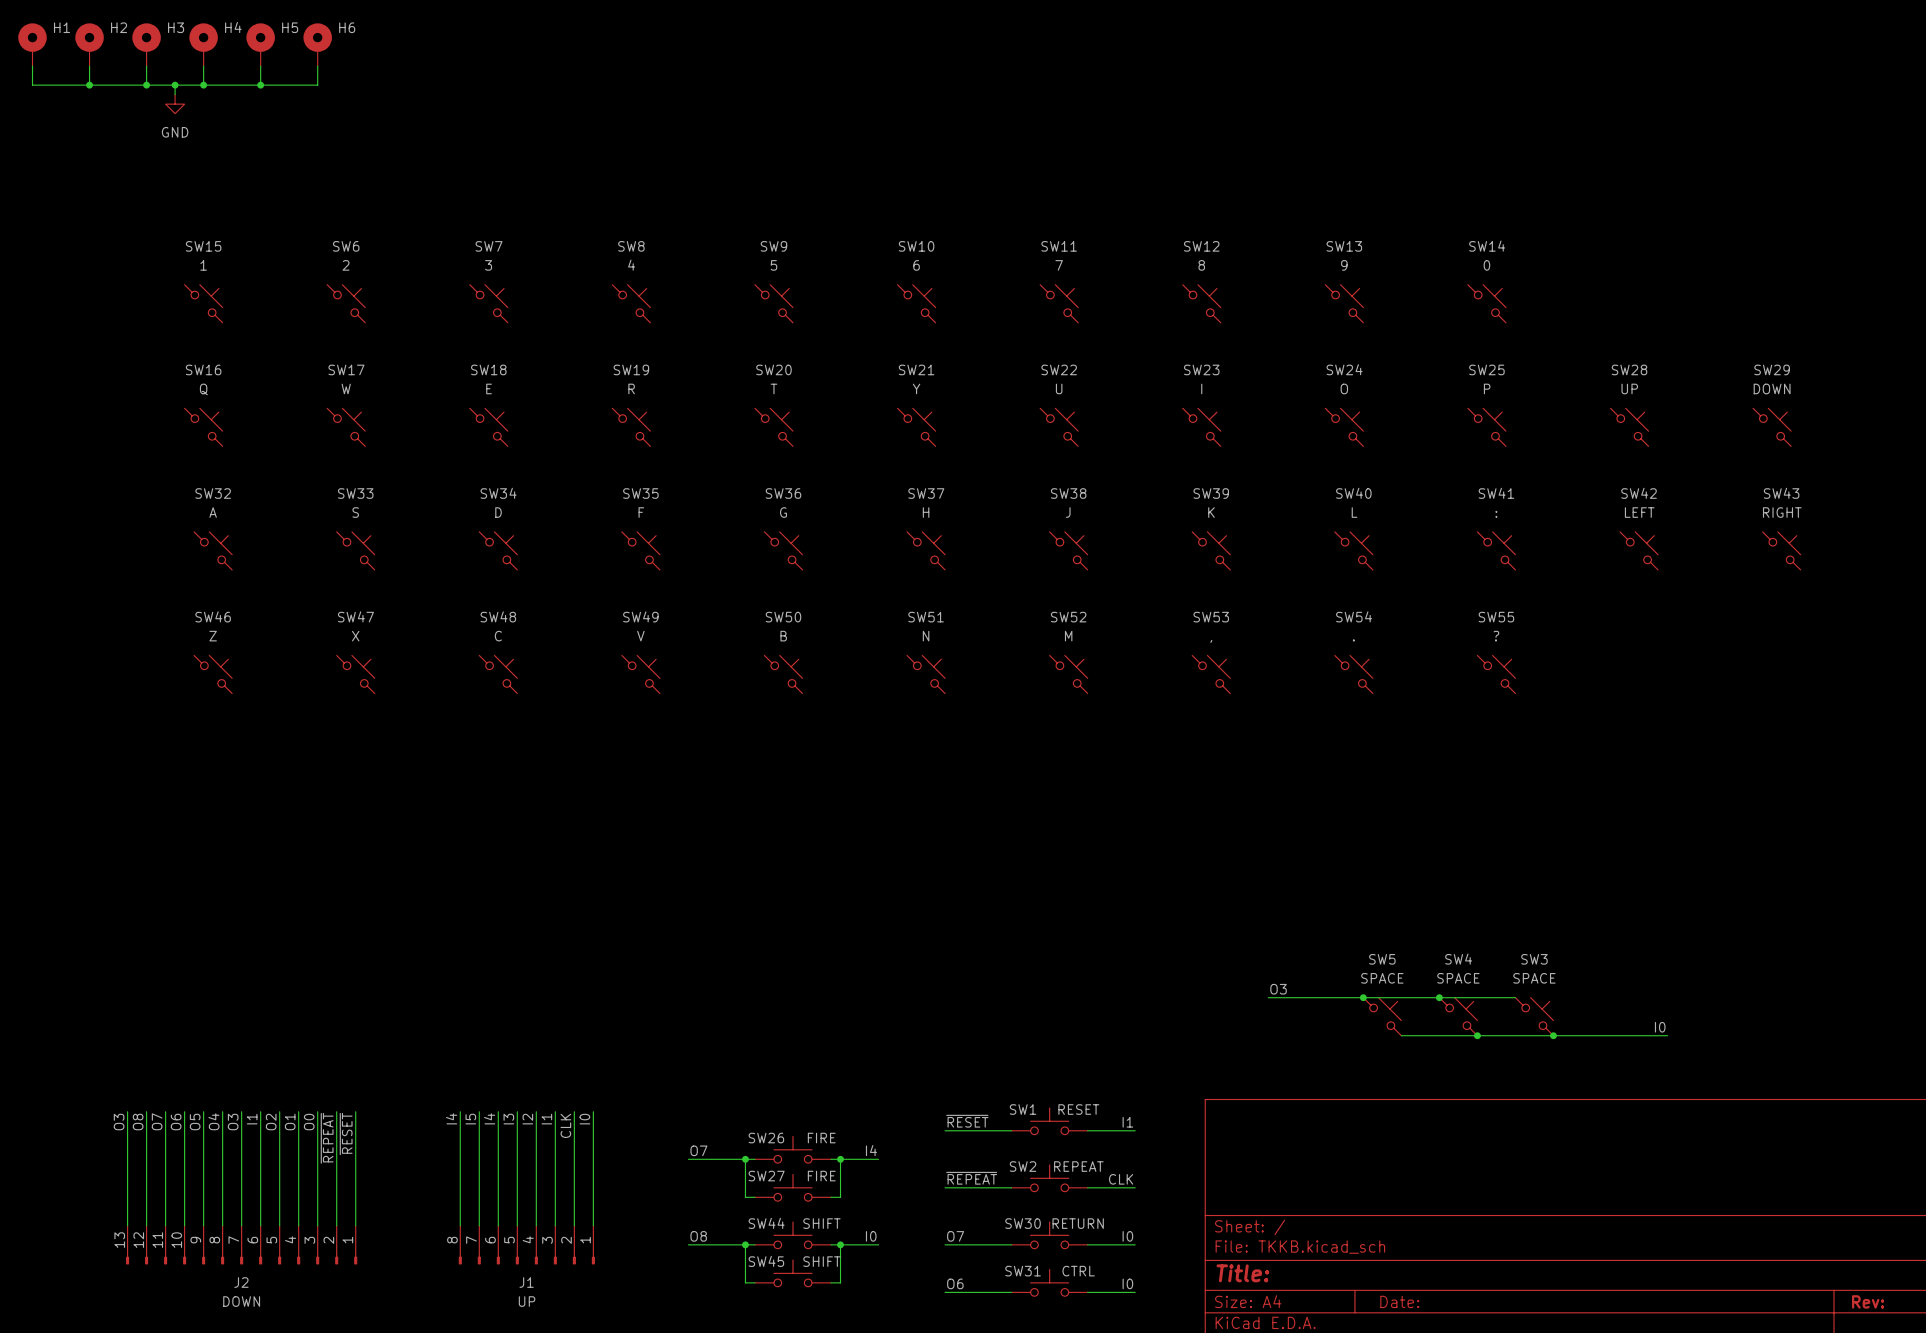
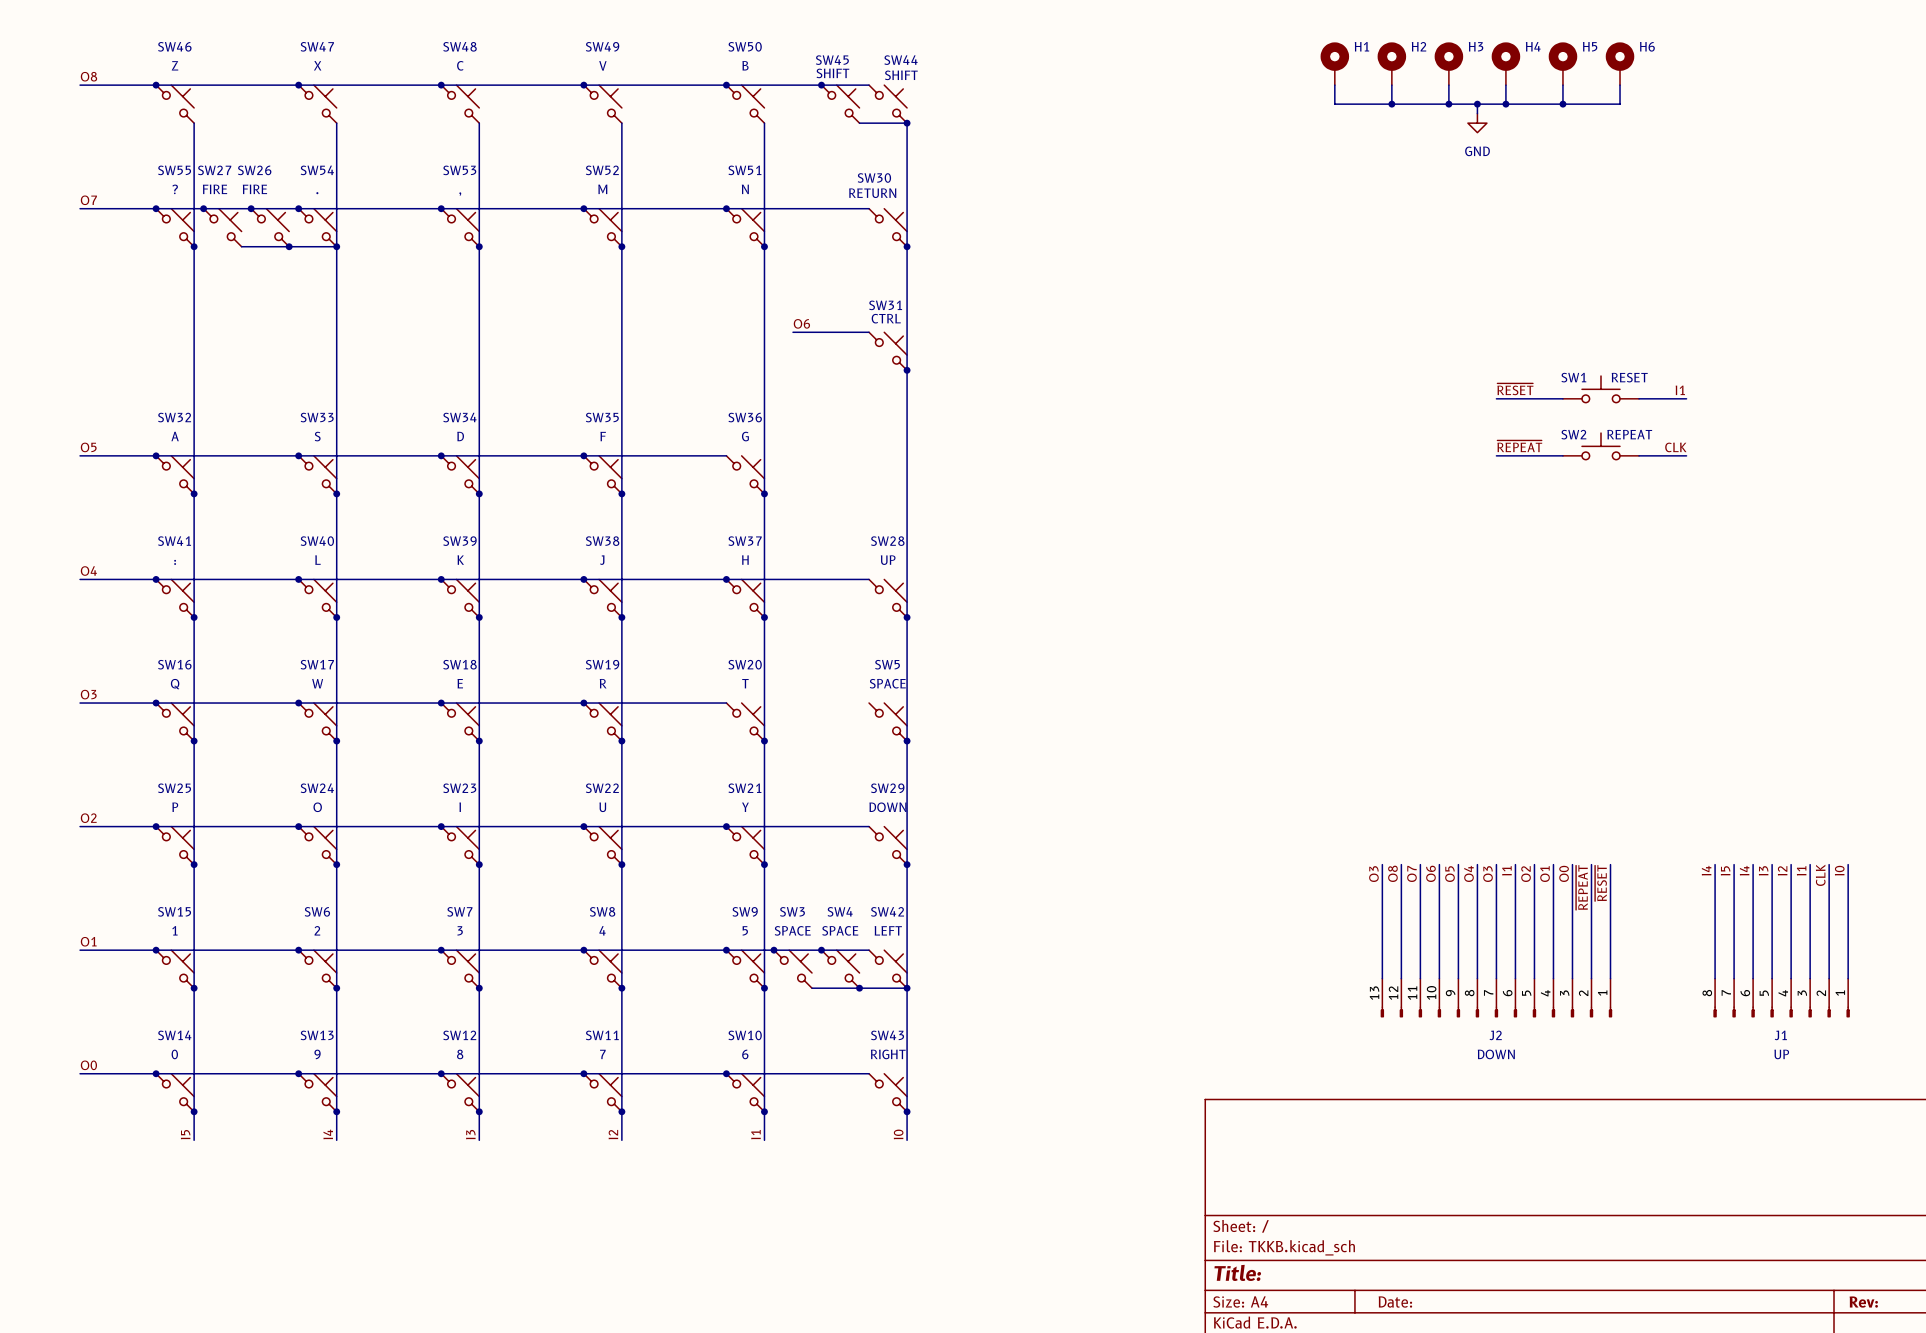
H1 position: (32, 44) -> (1334, 63)
H2 position: (89, 44) -> (1391, 63)
H3 position: (146, 44) -> (1448, 63)
H4 position: (203, 44) -> (1505, 63)
H5 position: (260, 44) -> (1562, 63)
H6 position: (317, 44) -> (1620, 63)
wire: (32, 66) (32, 85) (80, 85) -> none
wire: (89, 66) (89, 85) -> none
wire: (146, 66) (146, 85) -> none
wire: (203, 66) (203, 85) -> none
wire: (260, 66) (260, 85) -> none
wire: (317, 66) (317, 85) -> (869, 85) (317, 85)
label: none -> O8 (88, 76)
junction: (89, 85) -> none
junction: (146, 85) -> none
junction: none -> (156, 85)
wire: (175, 85) (175, 94) -> none
junction: (175, 85) -> none
junction: (203, 85) -> none
junction position: (260, 85) -> (298, 85)
junction: none -> (441, 85)
junction: none -> (583, 85)
junction: none -> (726, 85)
junction: none -> (821, 85)
wire: none -> (1334, 85) (1334, 104) (1620, 104) (1620, 85)
wire: none -> (1391, 85) (1391, 104)
wire: none -> (1448, 85) (1448, 104)
wire: none -> (1505, 85) (1505, 104)
wire: none -> (1562, 85) (1562, 104)
power symbol: GND (175, 104) -> none
junction: none -> (1391, 104)
junction: none -> (1448, 104)
wire: none -> (1477, 104) (1477, 113)
junction: none -> (1477, 104)
junction: none -> (1505, 104)
junction: none -> (1562, 104)
wire: none -> (194, 123) (194, 1140)
wire: none -> (336, 123) (336, 1111)
wire: none -> (479, 123) (479, 1111)
wire: none -> (621, 123) (621, 1140)
wire: none -> (764, 123) (764, 1140)
wire: none -> (859, 123) (907, 123) (907, 1140)
junction: none -> (907, 123)
power symbol: none -> GND (1477, 123)
label: none -> O7 (88, 200)
wire: none -> (80, 208) (869, 208)
junction: none -> (156, 208)
junction: none -> (203, 208)
junction: none -> (251, 208)
junction: none -> (298, 208)
junction: none -> (441, 208)
junction: none -> (583, 208)
junction: none -> (726, 208)
junction: none -> (194, 246)
wire: none -> (241, 246) (336, 246)
junction: none -> (289, 246)
junction: none -> (336, 246)
junction: none -> (479, 246)
junction: none -> (621, 246)
junction: none -> (764, 246)
junction: none -> (907, 246)
SW15 position: (203, 303) -> (175, 969)
SW6 position: (346, 303) -> (317, 969)
SW7 position: (488, 303) -> (460, 969)
SW8 position: (631, 303) -> (602, 969)
SW9 position: (773, 303) -> (745, 969)
SW10 position: (916, 303) -> (745, 1092)
SW11 position: (1059, 303) -> (602, 1092)
SW12 position: (1201, 303) -> (460, 1092)
SW13 position: (1344, 303) -> (317, 1092)
SW14 position: (1486, 303) -> (175, 1092)
label: none -> O6 (801, 323)
wire: none -> (792, 332) (869, 332)
junction: none -> (907, 370)
label: none -> ~{RESET} (1515, 389)
label: none -> I1 (1680, 390)
wire: none -> (1496, 398) (1562, 398)
wire: none -> (1639, 398) (1686, 398)
SW16 position: (203, 427) -> (175, 722)
SW17 position: (346, 427) -> (317, 722)
SW18 position: (488, 427) -> (460, 722)
SW19 position: (631, 427) -> (602, 722)
SW20 position: (773, 427) -> (745, 722)
SW21 position: (916, 427) -> (745, 845)
SW22 position: (1059, 427) -> (602, 845)
SW23 position: (1201, 427) -> (460, 845)
SW24 position: (1344, 427) -> (317, 845)
SW25 position: (1486, 427) -> (175, 845)
SW28 position: (1629, 427) -> (888, 598)
SW29 position: (1772, 427) -> (888, 845)
label: none -> ~{REPEAT} (1519, 446)
label: none -> O5 (88, 447)
label: none -> CLK (1675, 447)
wire: none -> (80, 455) (726, 455)
junction: none -> (156, 455)
junction: none -> (298, 455)
junction: none -> (441, 455)
junction: none -> (583, 455)
wire: none -> (1496, 455) (1562, 455)
wire: none -> (1639, 455) (1686, 455)
junction: none -> (194, 493)
junction: none -> (336, 493)
junction: none -> (479, 493)
junction: none -> (621, 493)
junction: none -> (764, 493)
SW32 position: (213, 550) -> (175, 474)
SW33 position: (355, 550) -> (317, 474)
SW34 position: (498, 550) -> (460, 474)
SW35 position: (640, 550) -> (602, 474)
SW36 position: (783, 550) -> (745, 474)
SW37 position: (926, 550) -> (745, 598)
SW38 position: (1068, 550) -> (602, 598)
SW39 position: (1211, 550) -> (460, 598)
SW40 position: (1353, 550) -> (317, 598)
SW41 position: (1496, 550) -> (175, 598)
SW42 position: (1639, 550) -> (888, 969)
SW43 position: (1781, 550) -> (888, 1092)
label: none -> O4 (88, 571)
wire: none -> (80, 579) (869, 579)
junction: none -> (156, 579)
junction: none -> (298, 579)
junction: none -> (441, 579)
junction: none -> (583, 579)
junction: none -> (726, 579)
junction: none -> (194, 617)
junction: none -> (336, 617)
junction: none -> (479, 617)
junction: none -> (621, 617)
junction: none -> (764, 617)
junction: none -> (907, 617)
SW46 position: (213, 674) -> (175, 104)
SW47 position: (355, 674) -> (317, 104)
SW48 position: (498, 674) -> (460, 104)
SW49 position: (640, 674) -> (602, 104)
SW50 position: (783, 674) -> (745, 104)
SW51 position: (926, 674) -> (745, 227)
SW52 position: (1068, 674) -> (602, 227)
SW53 position: (1211, 674) -> (460, 227)
SW54 position: (1353, 674) -> (317, 227)
SW55 position: (1496, 674) -> (175, 227)
label: none -> O3 (88, 694)
wire: none -> (80, 703) (726, 703)
junction: none -> (156, 703)
junction: none -> (298, 703)
junction: none -> (441, 703)
junction: none -> (583, 703)
junction: none -> (194, 741)
junction: none -> (336, 741)
junction: none -> (479, 741)
junction: none -> (621, 741)
junction: none -> (764, 741)
junction: none -> (907, 741)
label: none -> O2 (88, 818)
wire: none -> (80, 826) (869, 826)
junction: none -> (156, 826)
junction: none -> (298, 826)
junction: none -> (441, 826)
junction: none -> (583, 826)
junction: none -> (726, 826)
junction: none -> (194, 864)
junction: none -> (336, 864)
junction: none -> (479, 864)
junction: none -> (621, 864)
junction: none -> (764, 864)
junction: none -> (907, 864)
wire: none -> (1382, 864) (1382, 978)
wire: none -> (1401, 864) (1401, 978)
wire: none -> (1420, 864) (1420, 978)
wire: none -> (1439, 864) (1439, 978)
wire: none -> (1458, 864) (1458, 978)
wire: none -> (1477, 864) (1477, 978)
wire: none -> (1496, 864) (1496, 978)
wire: none -> (1515, 864) (1515, 978)
wire: none -> (1534, 864) (1534, 978)
wire: none -> (1553, 864) (1553, 978)
wire: none -> (1572, 864) (1572, 978)
wire: none -> (1591, 864) (1591, 978)
wire: none -> (1610, 864) (1610, 978)
wire: none -> (1715, 864) (1715, 978)
wire: none -> (1734, 864) (1734, 978)
wire: none -> (1753, 864) (1753, 978)
wire: none -> (1772, 864) (1772, 978)
wire: none -> (1791, 864) (1791, 978)
wire: none -> (1810, 864) (1810, 978)
wire: none -> (1829, 864) (1829, 978)
wire: none -> (1848, 864) (1848, 978)
label: none -> I1 (1506, 870)
label: none -> I4 (1706, 870)
label: none -> I5 (1725, 870)
label: none -> I4 (1744, 870)
label: none -> I3 (1763, 870)
label: none -> I2 (1782, 870)
label: none -> I1 (1801, 870)
label: none -> I0 (1839, 870)
label: none -> O3 (1373, 874)
label: none -> O8 (1392, 873)
label: none -> O7 (1411, 873)
label: none -> O6 (1430, 873)
label: none -> O5 (1449, 874)
label: none -> O4 (1468, 873)
label: none -> O3 (1488, 874)
label: none -> O2 (1526, 874)
label: none -> O1 (1545, 874)
label: none -> O0 (1564, 873)
label: none -> CLK (1820, 875)
label: none -> ~{RESET} (1600, 883)
label: none -> ~{REPEAT} (1581, 887)
label: none -> O1 (88, 941)
wire: none -> (80, 950) (869, 950)
junction: none -> (156, 950)
junction: none -> (298, 950)
junction: none -> (441, 950)
junction: none -> (583, 950)
junction: none -> (726, 950)
junction: none -> (773, 950)
junction: none -> (821, 950)
junction: none -> (194, 988)
junction: none -> (336, 988)
junction: none -> (479, 988)
junction: none -> (621, 988)
junction: none -> (764, 988)
wire: none -> (812, 988) (907, 988)
junction: none -> (859, 988)
junction: none -> (907, 988)
label: O3 (1278, 989) -> none
wire: (1268, 997) (1515, 997) -> none
junction: (1363, 997) -> none
junction: (1439, 997) -> none
SW5 position: (1382, 1016) -> (888, 722)
SW4 position: (1458, 1016) -> (840, 969)
SW3 position: (1534, 1016) -> (792, 969)
label: I0 (1660, 1027) -> none
wire: (1401, 1035) (1667, 1035) -> none
junction: (1477, 1035) -> none
junction: (1553, 1035) -> none
label: none -> O0 (88, 1065)
wire: none -> (80, 1073) (869, 1073)
junction: none -> (156, 1073)
junction: none -> (298, 1073)
junction: none -> (441, 1073)
junction: none -> (583, 1073)
junction: none -> (726, 1073)
wire: (127, 1111) (127, 1225) -> none
wire: (146, 1111) (146, 1225) -> none
wire: (165, 1111) (165, 1225) -> none
wire: (184, 1111) (184, 1225) -> none
junction: none -> (194, 1111)
wire: (203, 1111) (203, 1225) -> none
wire: (222, 1111) (222, 1225) -> none
wire: (241, 1111) (241, 1225) -> none
wire: (260, 1111) (260, 1225) -> none
wire: (279, 1111) (279, 1225) -> none
wire: (298, 1111) (298, 1225) -> none
wire: (317, 1111) (317, 1225) -> none
junction: none -> (336, 1111)
wire: (355, 1111) (355, 1225) -> none
wire: (460, 1111) (460, 1225) -> none
junction: none -> (479, 1111)
wire: (498, 1111) (498, 1225) -> none
wire: (517, 1111) (517, 1225) -> none
wire: (536, 1111) (536, 1225) -> none
wire: (555, 1111) (555, 1225) -> none
wire: (574, 1111) (574, 1225) -> none
wire: (593, 1111) (593, 1225) -> none
junction: none -> (621, 1111)
junction: none -> (764, 1111)
junction: none -> (907, 1111)
label: I4 (451, 1118) -> none
label: I4 (489, 1118) -> none
label: I1 (252, 1119) -> none
label: I5 (470, 1119) -> none
label position: I3 (508, 1119) -> I3 (470, 1134)
label position: I2 (527, 1119) -> I2 (613, 1134)
label: I1 (546, 1119) -> none
label: I0 (584, 1119) -> none
label: O7 (157, 1121) -> none
label: O4 (213, 1121) -> none
label: ~{RESET} (967, 1121) -> none
SW1 position: (1049, 1121) -> (1600, 389)
label: O3 (119, 1122) -> none
label: O8 (138, 1122) -> none
label: O6 (176, 1122) -> none
label: O5 (195, 1122) -> none
label: O3 (233, 1122) -> none
label: O2 (271, 1122) -> none
label: O1 (290, 1122) -> none
label: O0 (309, 1122) -> none
label: I1 (1127, 1122) -> none
label: CLK (565, 1125) -> none
wire: (945, 1130) (1011, 1130) -> none
wire: (1087, 1130) (1135, 1130) -> none
label: none -> I5 (185, 1134)
label: none -> I4 (328, 1134)
label: none -> I1 (755, 1134)
label: ~{RESET} (346, 1134) -> none
SW26 symbol: [754, 1136, 832, 1164] -> [251, 208, 290, 247]
label: ~{REPEAT} (327, 1138) -> none
SW26 name position: SW26 (766, 1138) -> SW26 (254, 170)
SW26 value position: FIRE (821, 1138) -> FIRE (254, 189)
wire: (336, 1140) (336, 1225) -> none
wire: (479, 1140) (479, 1225) -> none
label: O7 (698, 1150) -> none
label: I4 (871, 1150) -> none
wire: (688, 1159) (754, 1159) -> none
wire: (745, 1159) (745, 1197) (754, 1197) -> none
junction: (745, 1159) -> none
wire: (831, 1159) (878, 1159) -> none
wire: (840, 1159) (840, 1197) (831, 1197) -> none
junction: (840, 1159) -> none
SW27 symbol: [754, 1174, 832, 1202] -> [203, 208, 242, 247]
SW27 name position: SW27 (766, 1176) -> SW27 (214, 170)
SW27 value position: FIRE (821, 1176) -> FIRE (215, 189)
label: ~{REPEAT} (971, 1178) -> none
SW2 position: (1049, 1178) -> (1600, 446)
label: CLK (1121, 1179) -> none
wire: (945, 1187) (1011, 1187) -> none
wire: (1087, 1187) (1135, 1187) -> none
SW44 symbol: [754, 1222, 832, 1249] -> [869, 85, 908, 124]
SW30 symbol: [1011, 1222, 1088, 1249] -> [869, 208, 908, 247]
SW44 name position: SW44 (766, 1223) -> SW44 (900, 60)
SW44 value position: SHIFT (821, 1223) -> SHIFT (901, 75)
SW30 name position: SW30 (1023, 1223) -> SW30 (874, 177)
SW30 value position: RETURN (1078, 1223) -> RETURN (872, 193)
label: O8 (698, 1236) -> none
label rotation: 0° (871, 1236) -> 90° counterclockwise (898, 1134)
label position: I0 (871, 1236) -> I0 (898, 1134)
label: O7 (955, 1236) -> none
label: I0 (1127, 1236) -> none
wire: (688, 1244) (754, 1244) -> none
wire: (745, 1244) (745, 1282) (754, 1282) -> none
junction: (745, 1244) -> none
wire: (831, 1244) (878, 1244) -> none
wire: (840, 1244) (840, 1282) (831, 1282) -> none
junction: (840, 1244) -> none
wire: (945, 1244) (1011, 1244) -> none
wire: (1087, 1244) (1135, 1244) -> none
J2 position: (241, 1245) -> (1496, 997)
J1 position: (526, 1245) -> (1781, 997)
SW45 symbol: [754, 1260, 832, 1287] -> [821, 85, 860, 124]
SW45 name position: SW45 (766, 1261) -> SW45 (832, 60)
SW45 value position: SHIFT (821, 1261) -> SHIFT (832, 73)
SW31 symbol: [1011, 1269, 1088, 1297] -> [869, 332, 908, 371]
SW31 name position: SW31 (1023, 1271) -> SW31 (885, 305)
SW31 value position: CTRL (1078, 1271) -> CTRL (886, 318)
label: O6 (955, 1283) -> none
label: I0 (1127, 1283) -> none
wire: (945, 1292) (1011, 1292) -> none
wire: (1087, 1292) (1135, 1292) -> none

